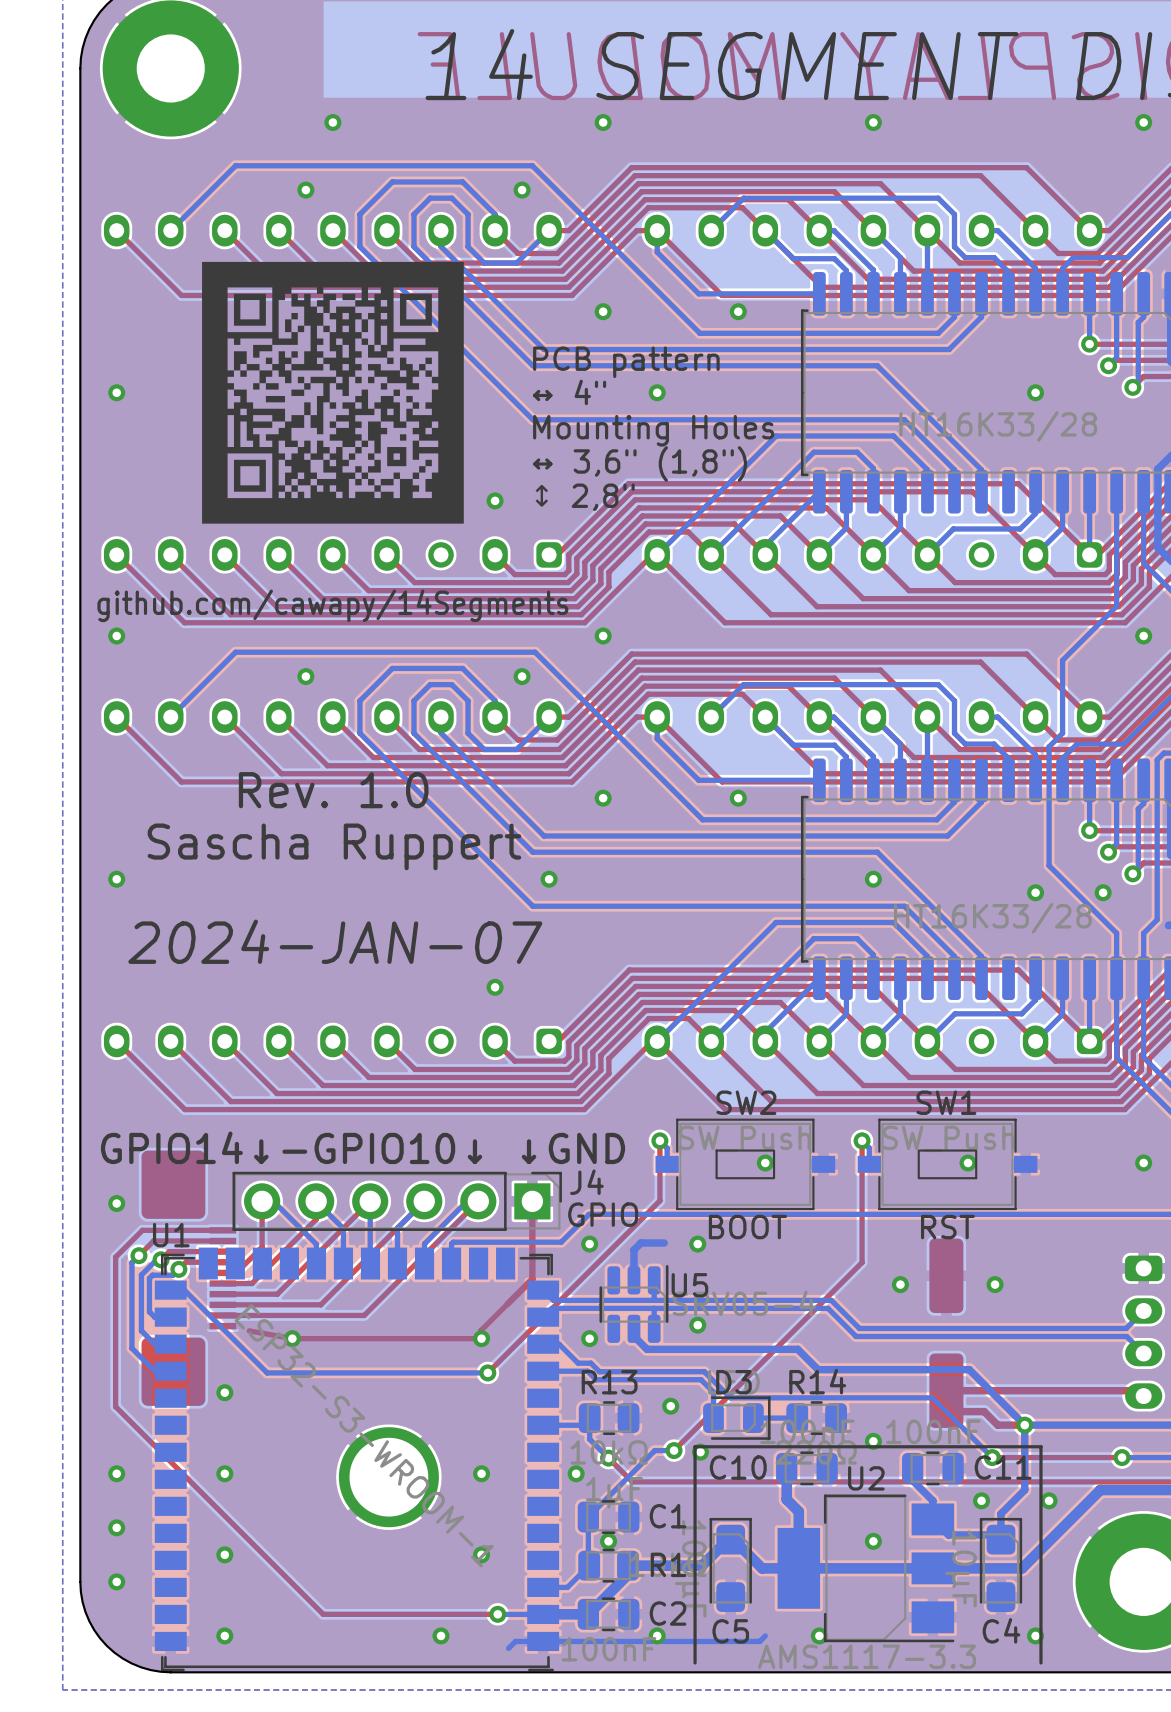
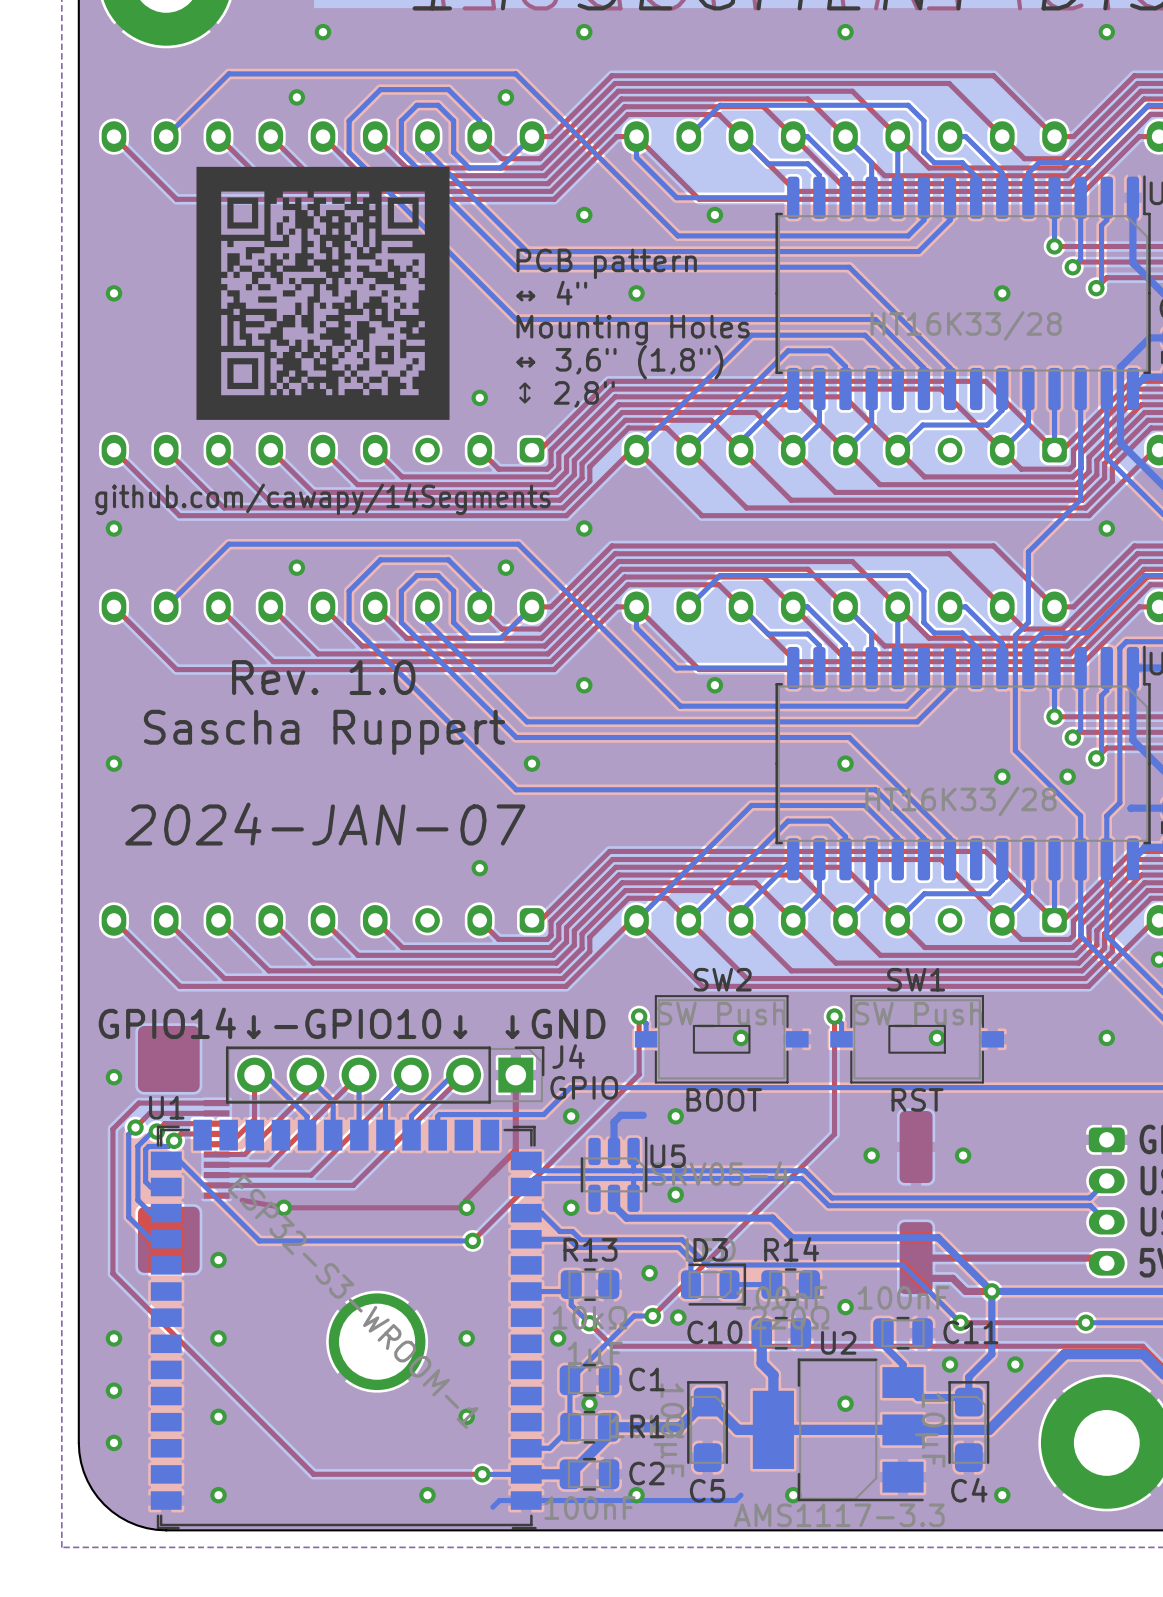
line: (1040, 1662) (1040, 1446) (695, 1446) (695, 1662) -> none

